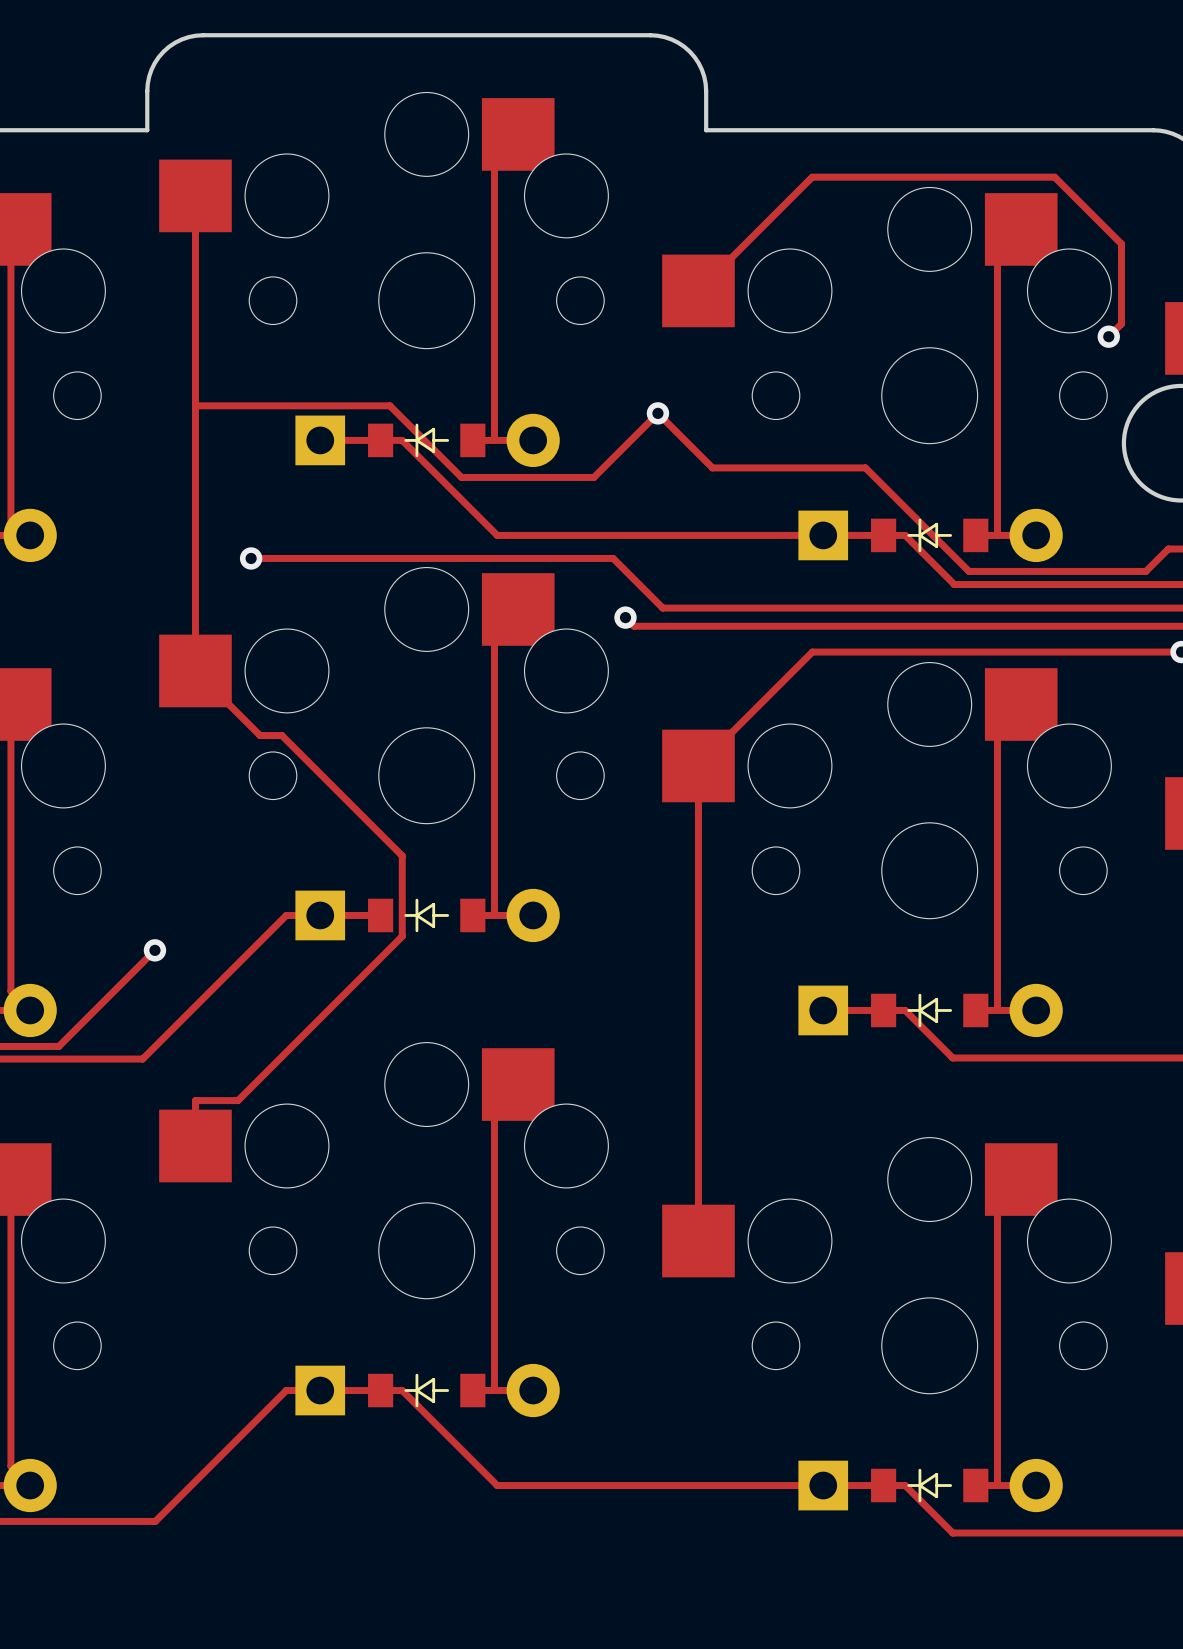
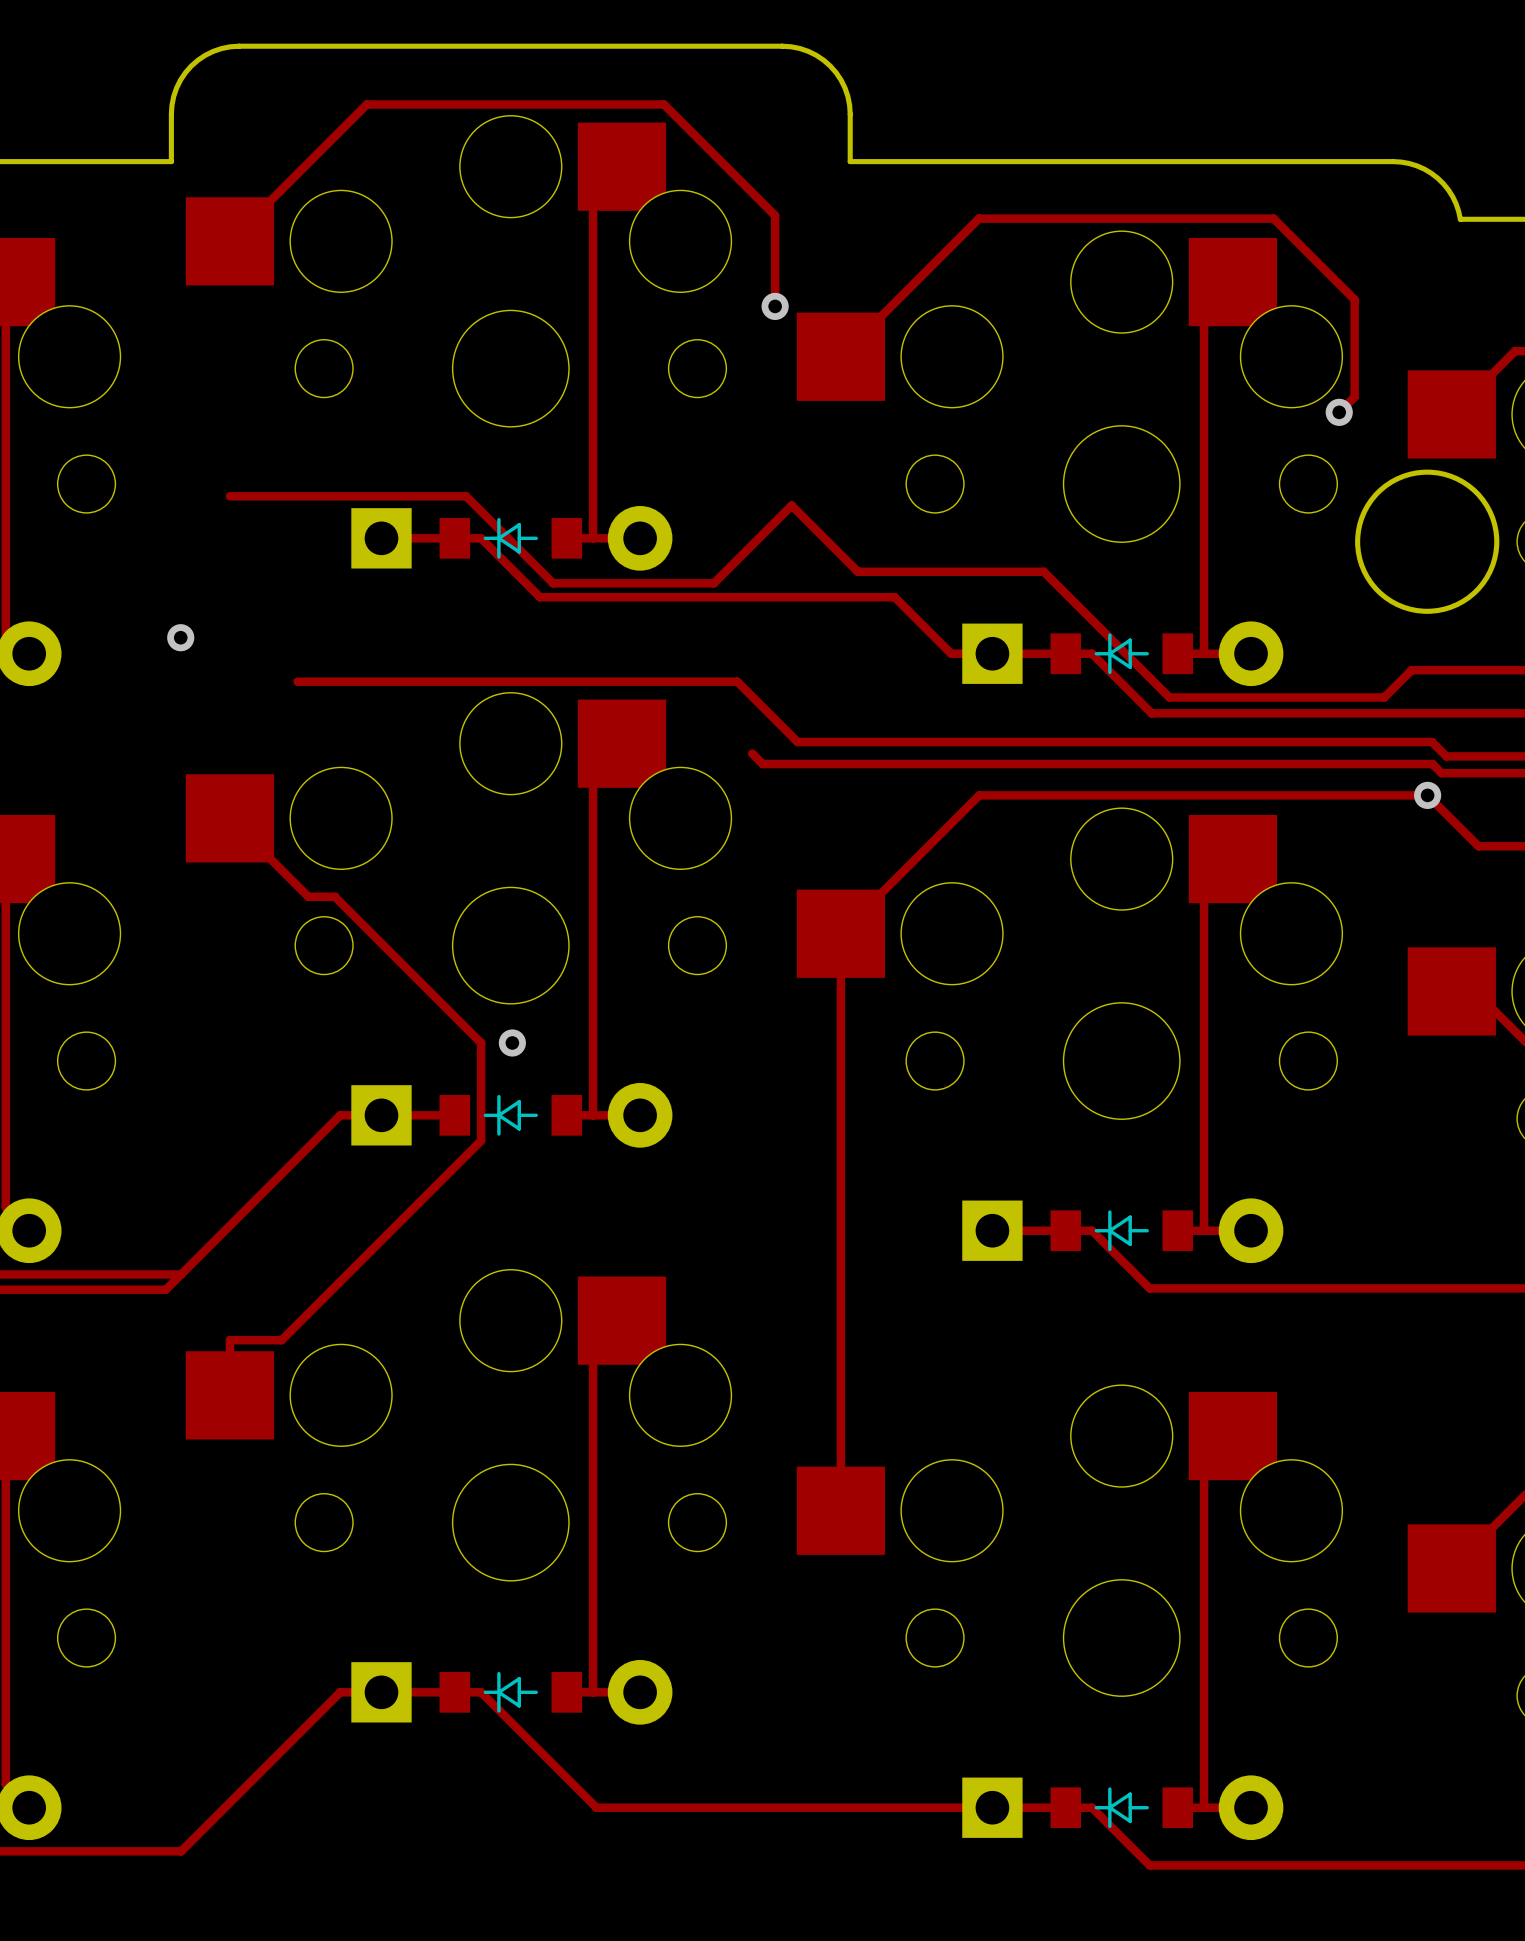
track: (195, 195) (195, 670) -> (229, 241) (366, 104) (663, 104) (775, 215) (775, 306)
via position: (657, 413) -> (775, 306)
track: (450, 488) (497, 535) (789, 535) -> (540, 597) (894, 597) (951, 653)
via position: (251, 558) -> (180, 637)
via: (625, 617) -> none
via: none -> (512, 1042)
track: (154, 950) (58, 1046) -> (181, 1274) (63, 1274)
via: (154, 950) -> none

